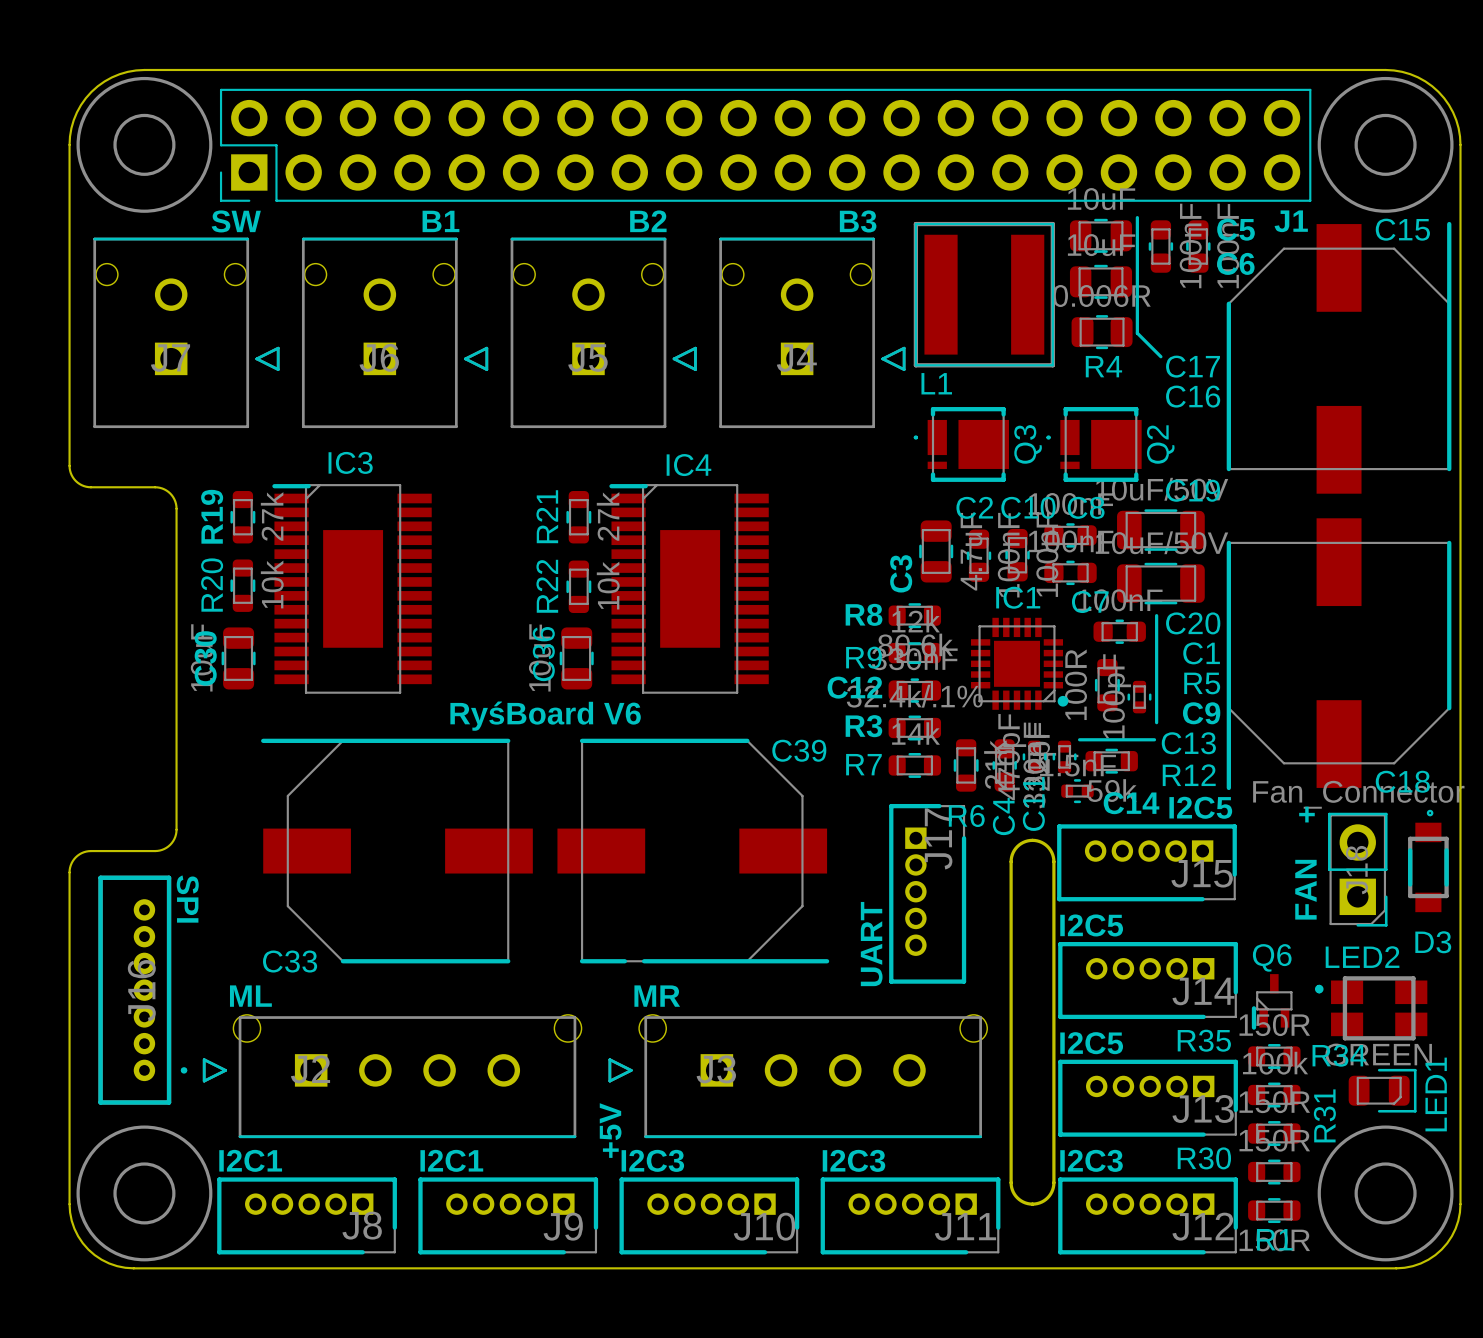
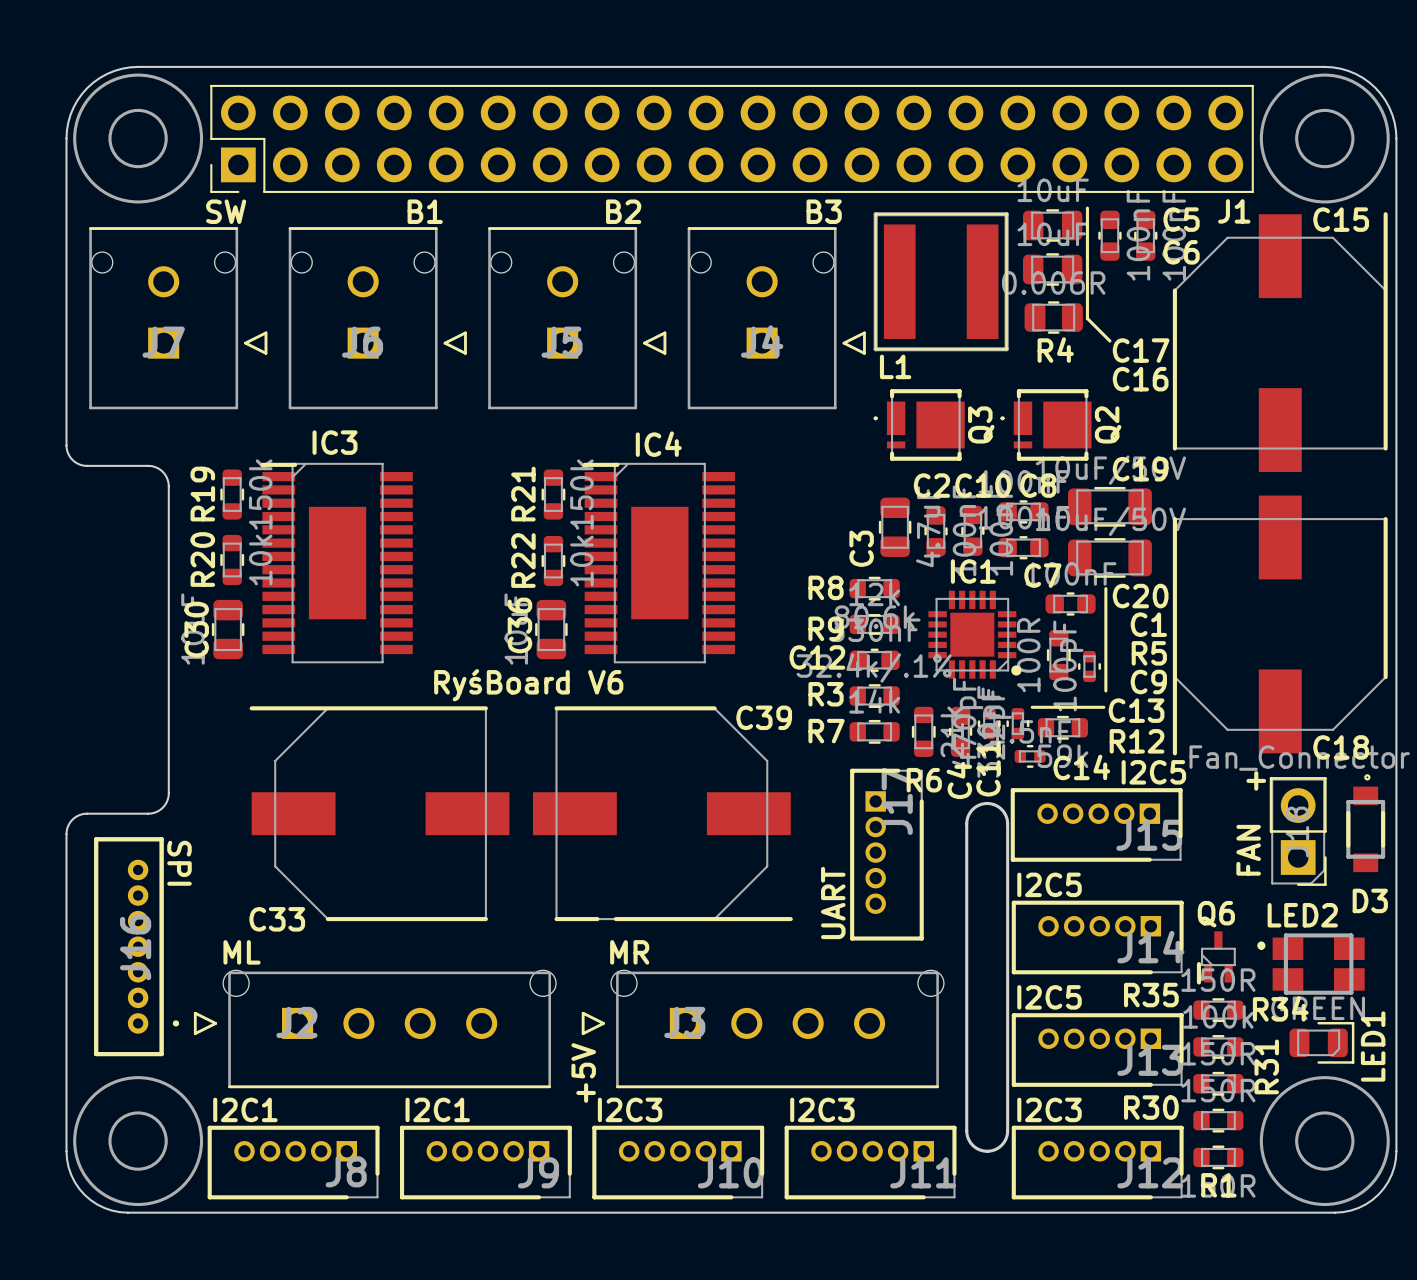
R19 value: 27k (272, 516) -> 150k (260, 494)
R21 value: 27k (608, 516) -> 150k (581, 494)

